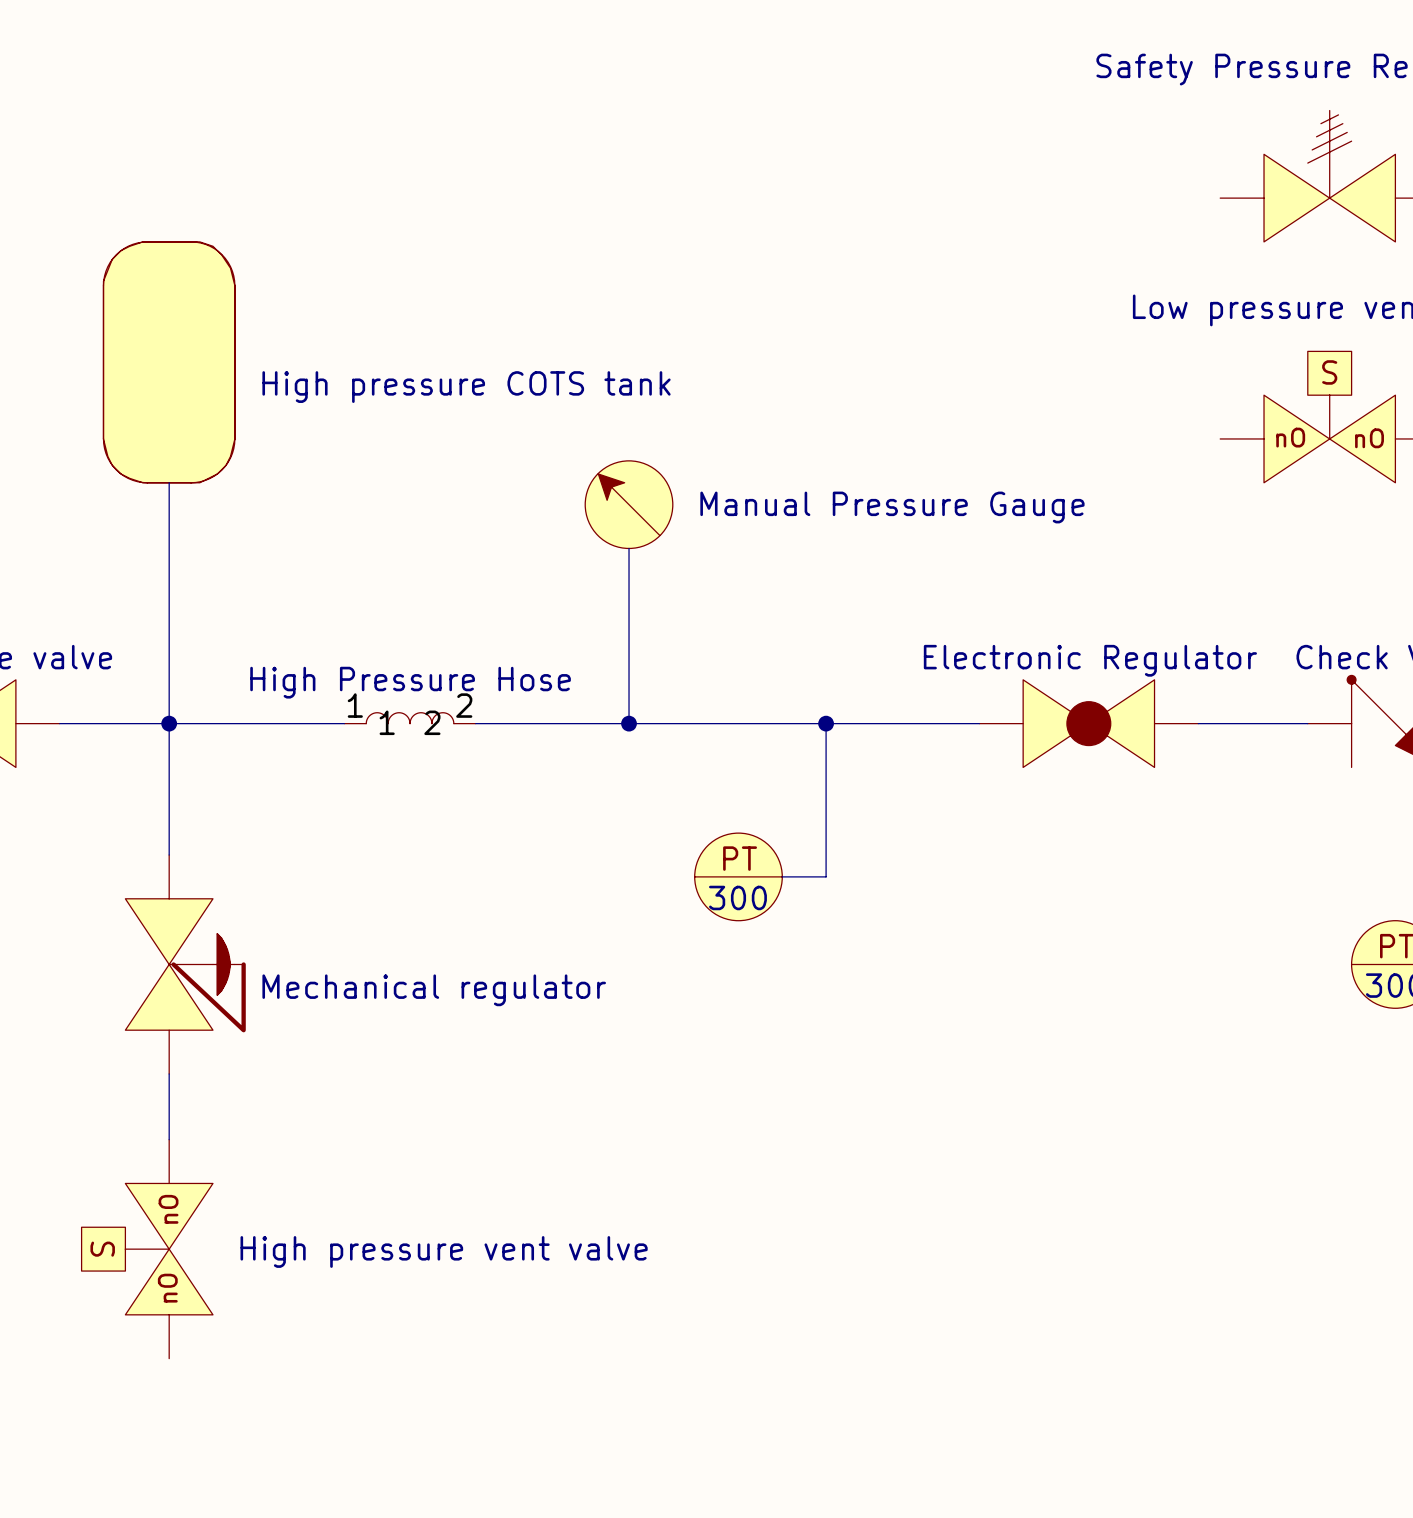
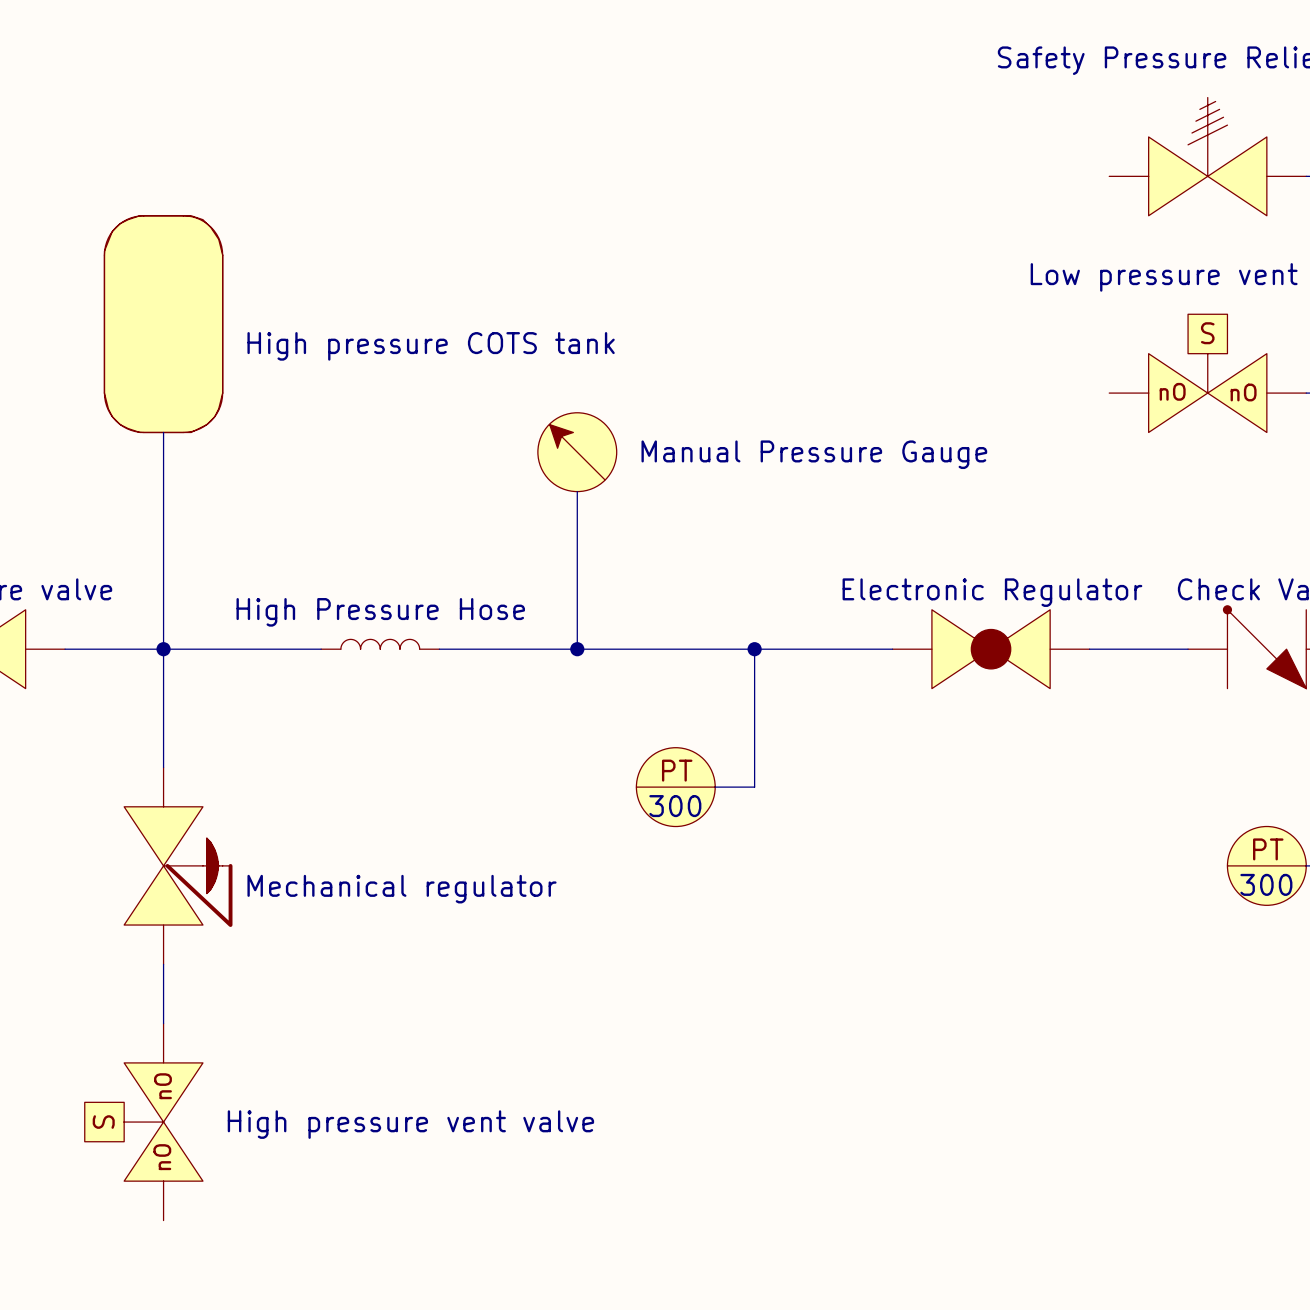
part pin number: 1 (355, 705) -> none
part pin number: 2 (464, 705) -> none
part pin name: 1 (387, 722) -> none
part pin name: 2 (432, 722) -> none

